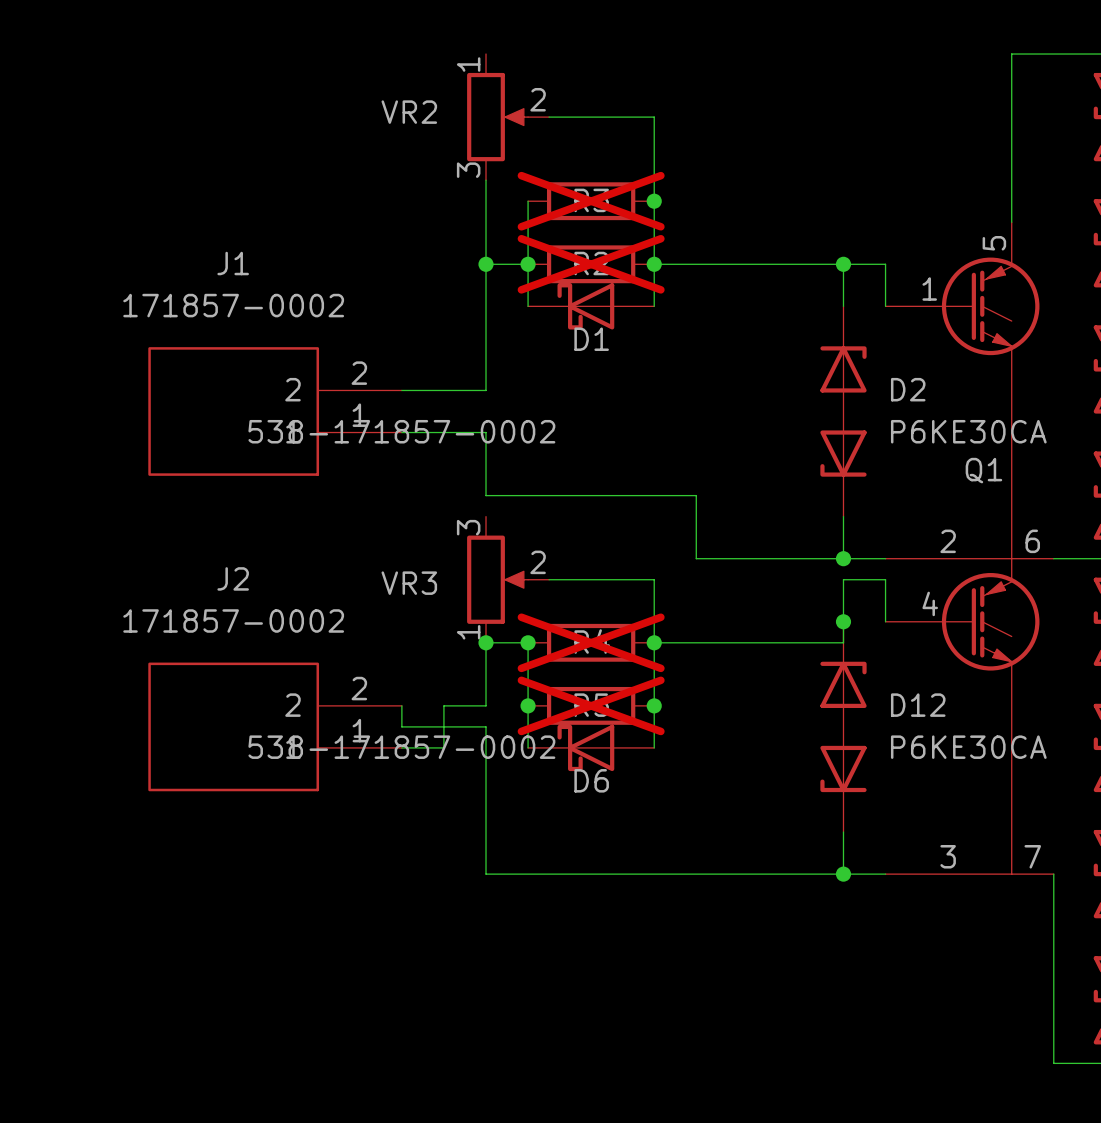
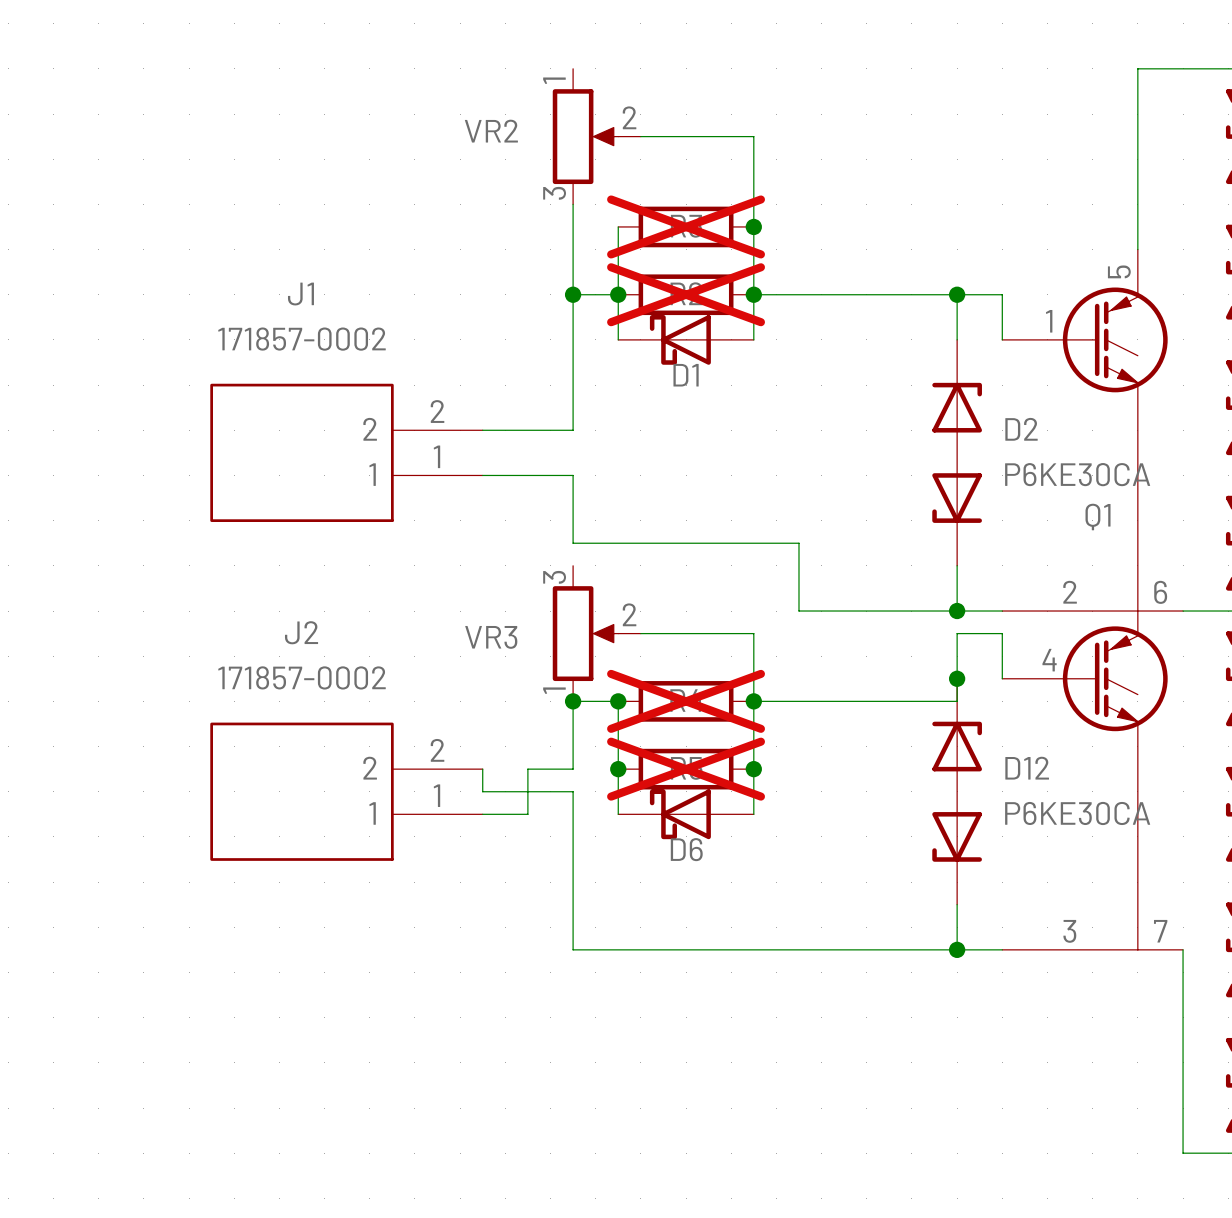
J1 text: 538-171857-0002 (401, 431) -> none
J2 text: 538-171857-0002 (401, 747) -> none

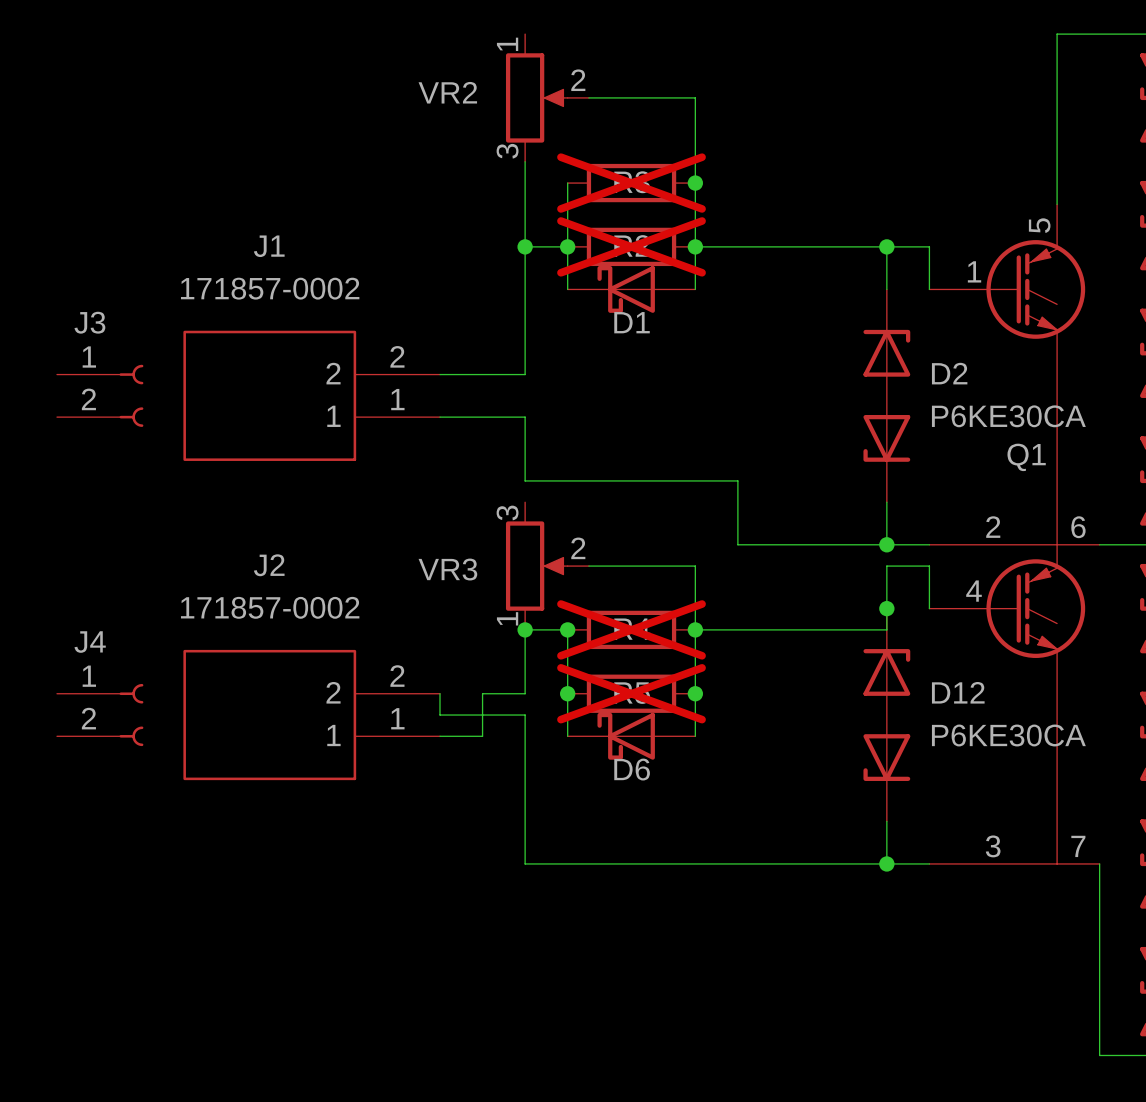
J3: none -> (100, 395)
J4: none -> (100, 715)

